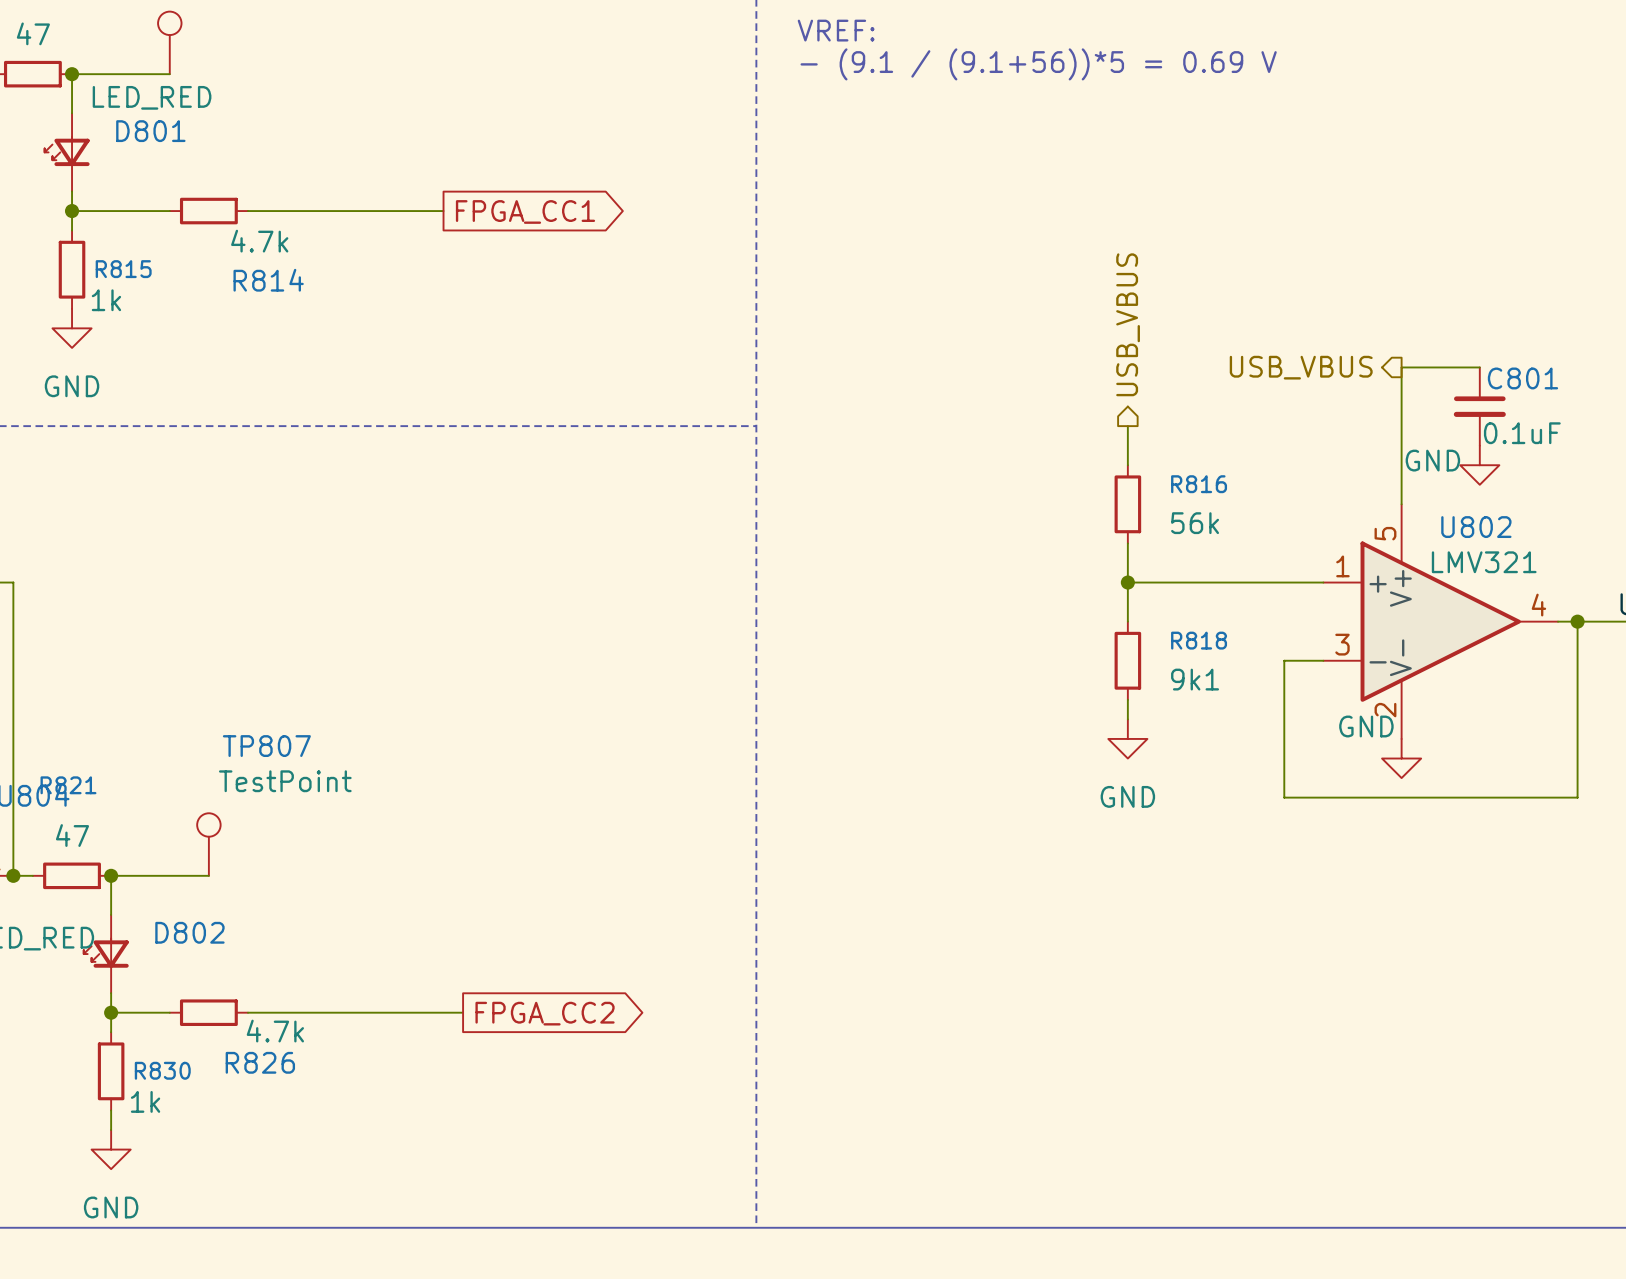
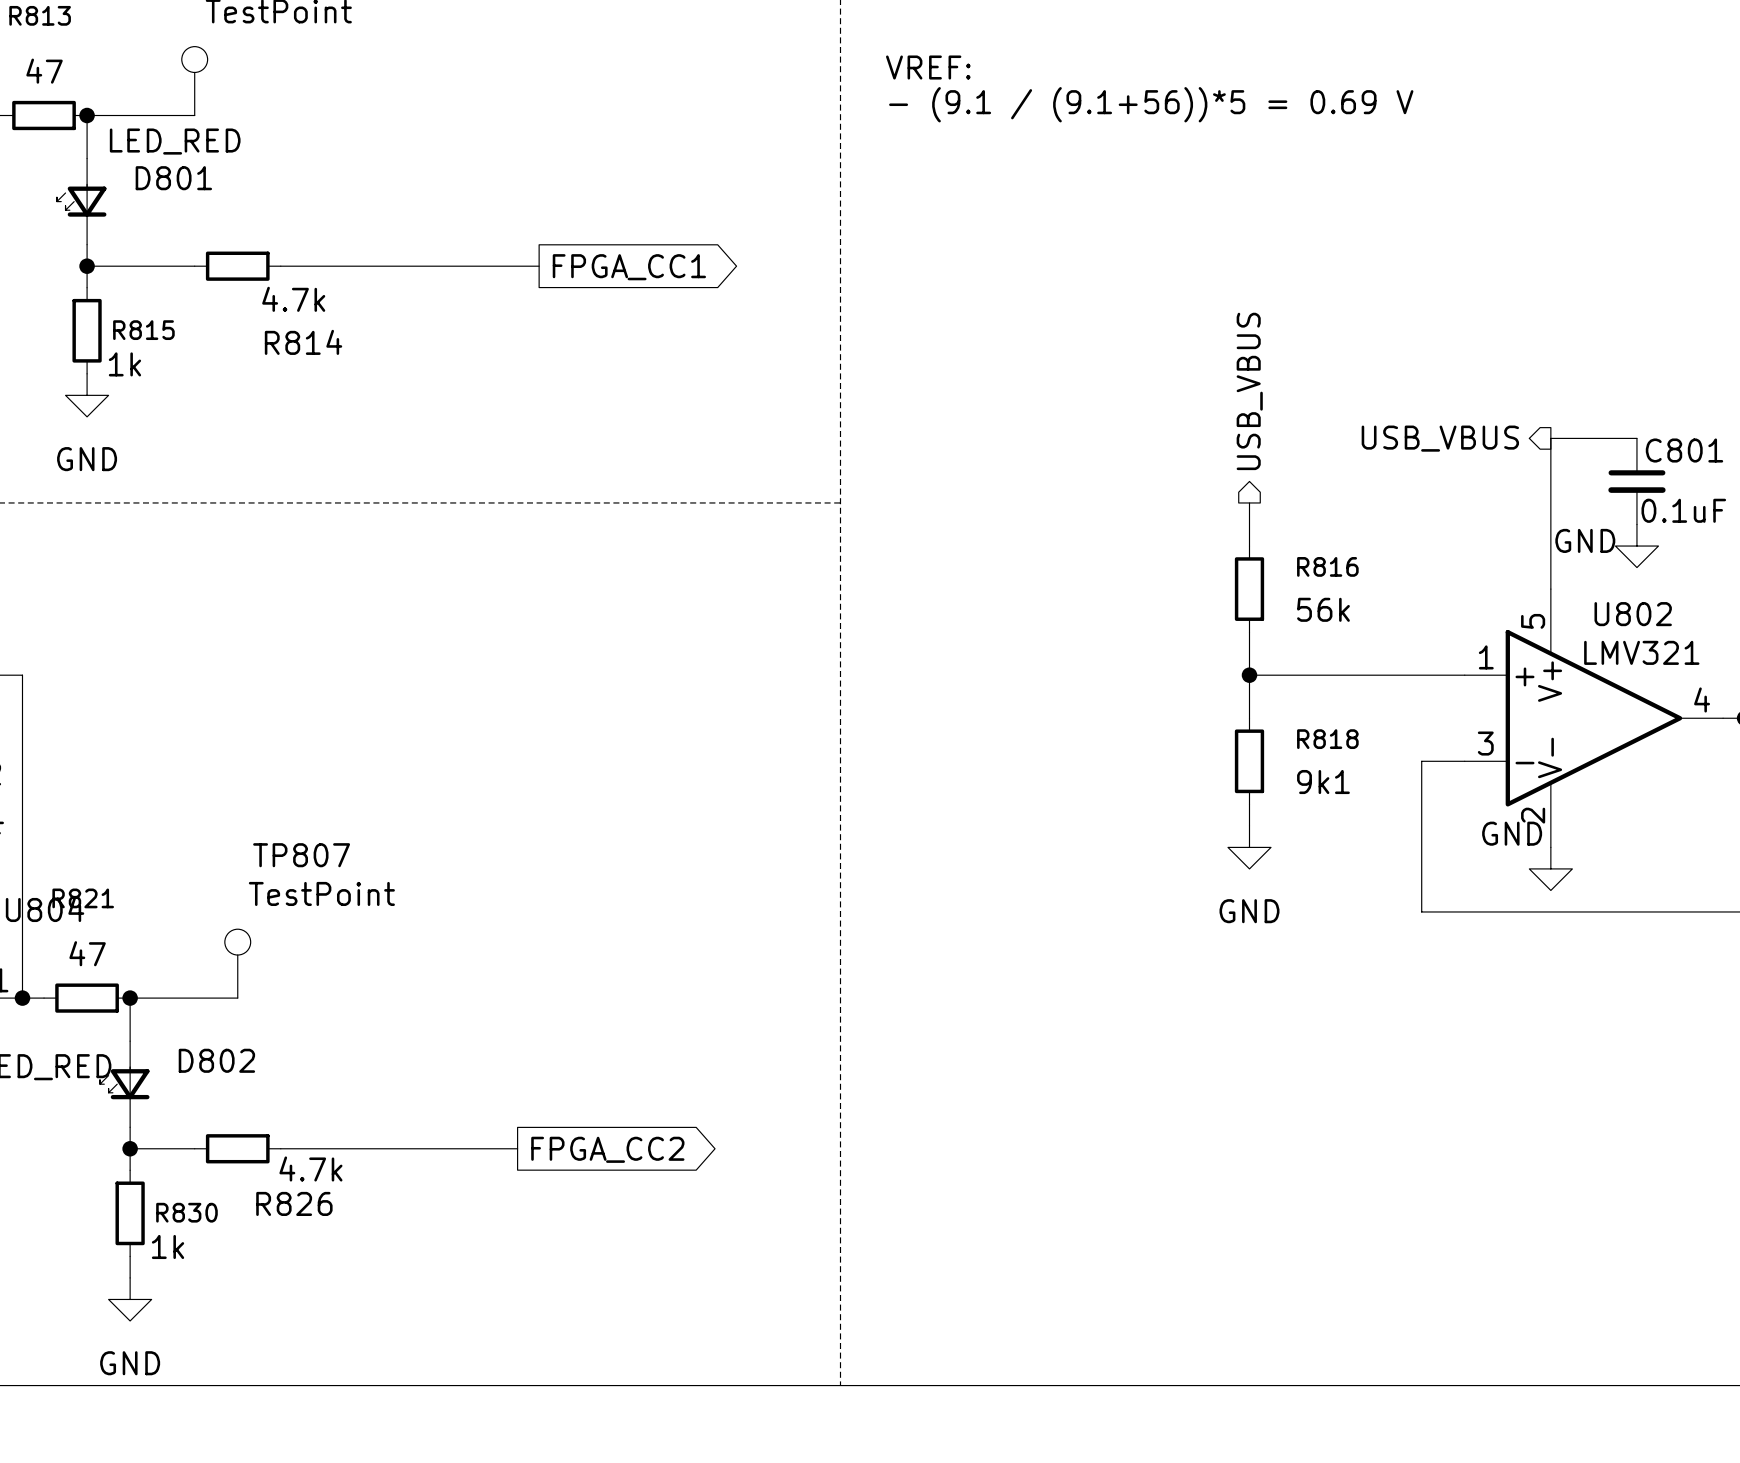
wire: none -> (496, 266) (539, 266)
global label position: FPGA_CC1 (525, 211) -> FPGA_CC1 (629, 267)

